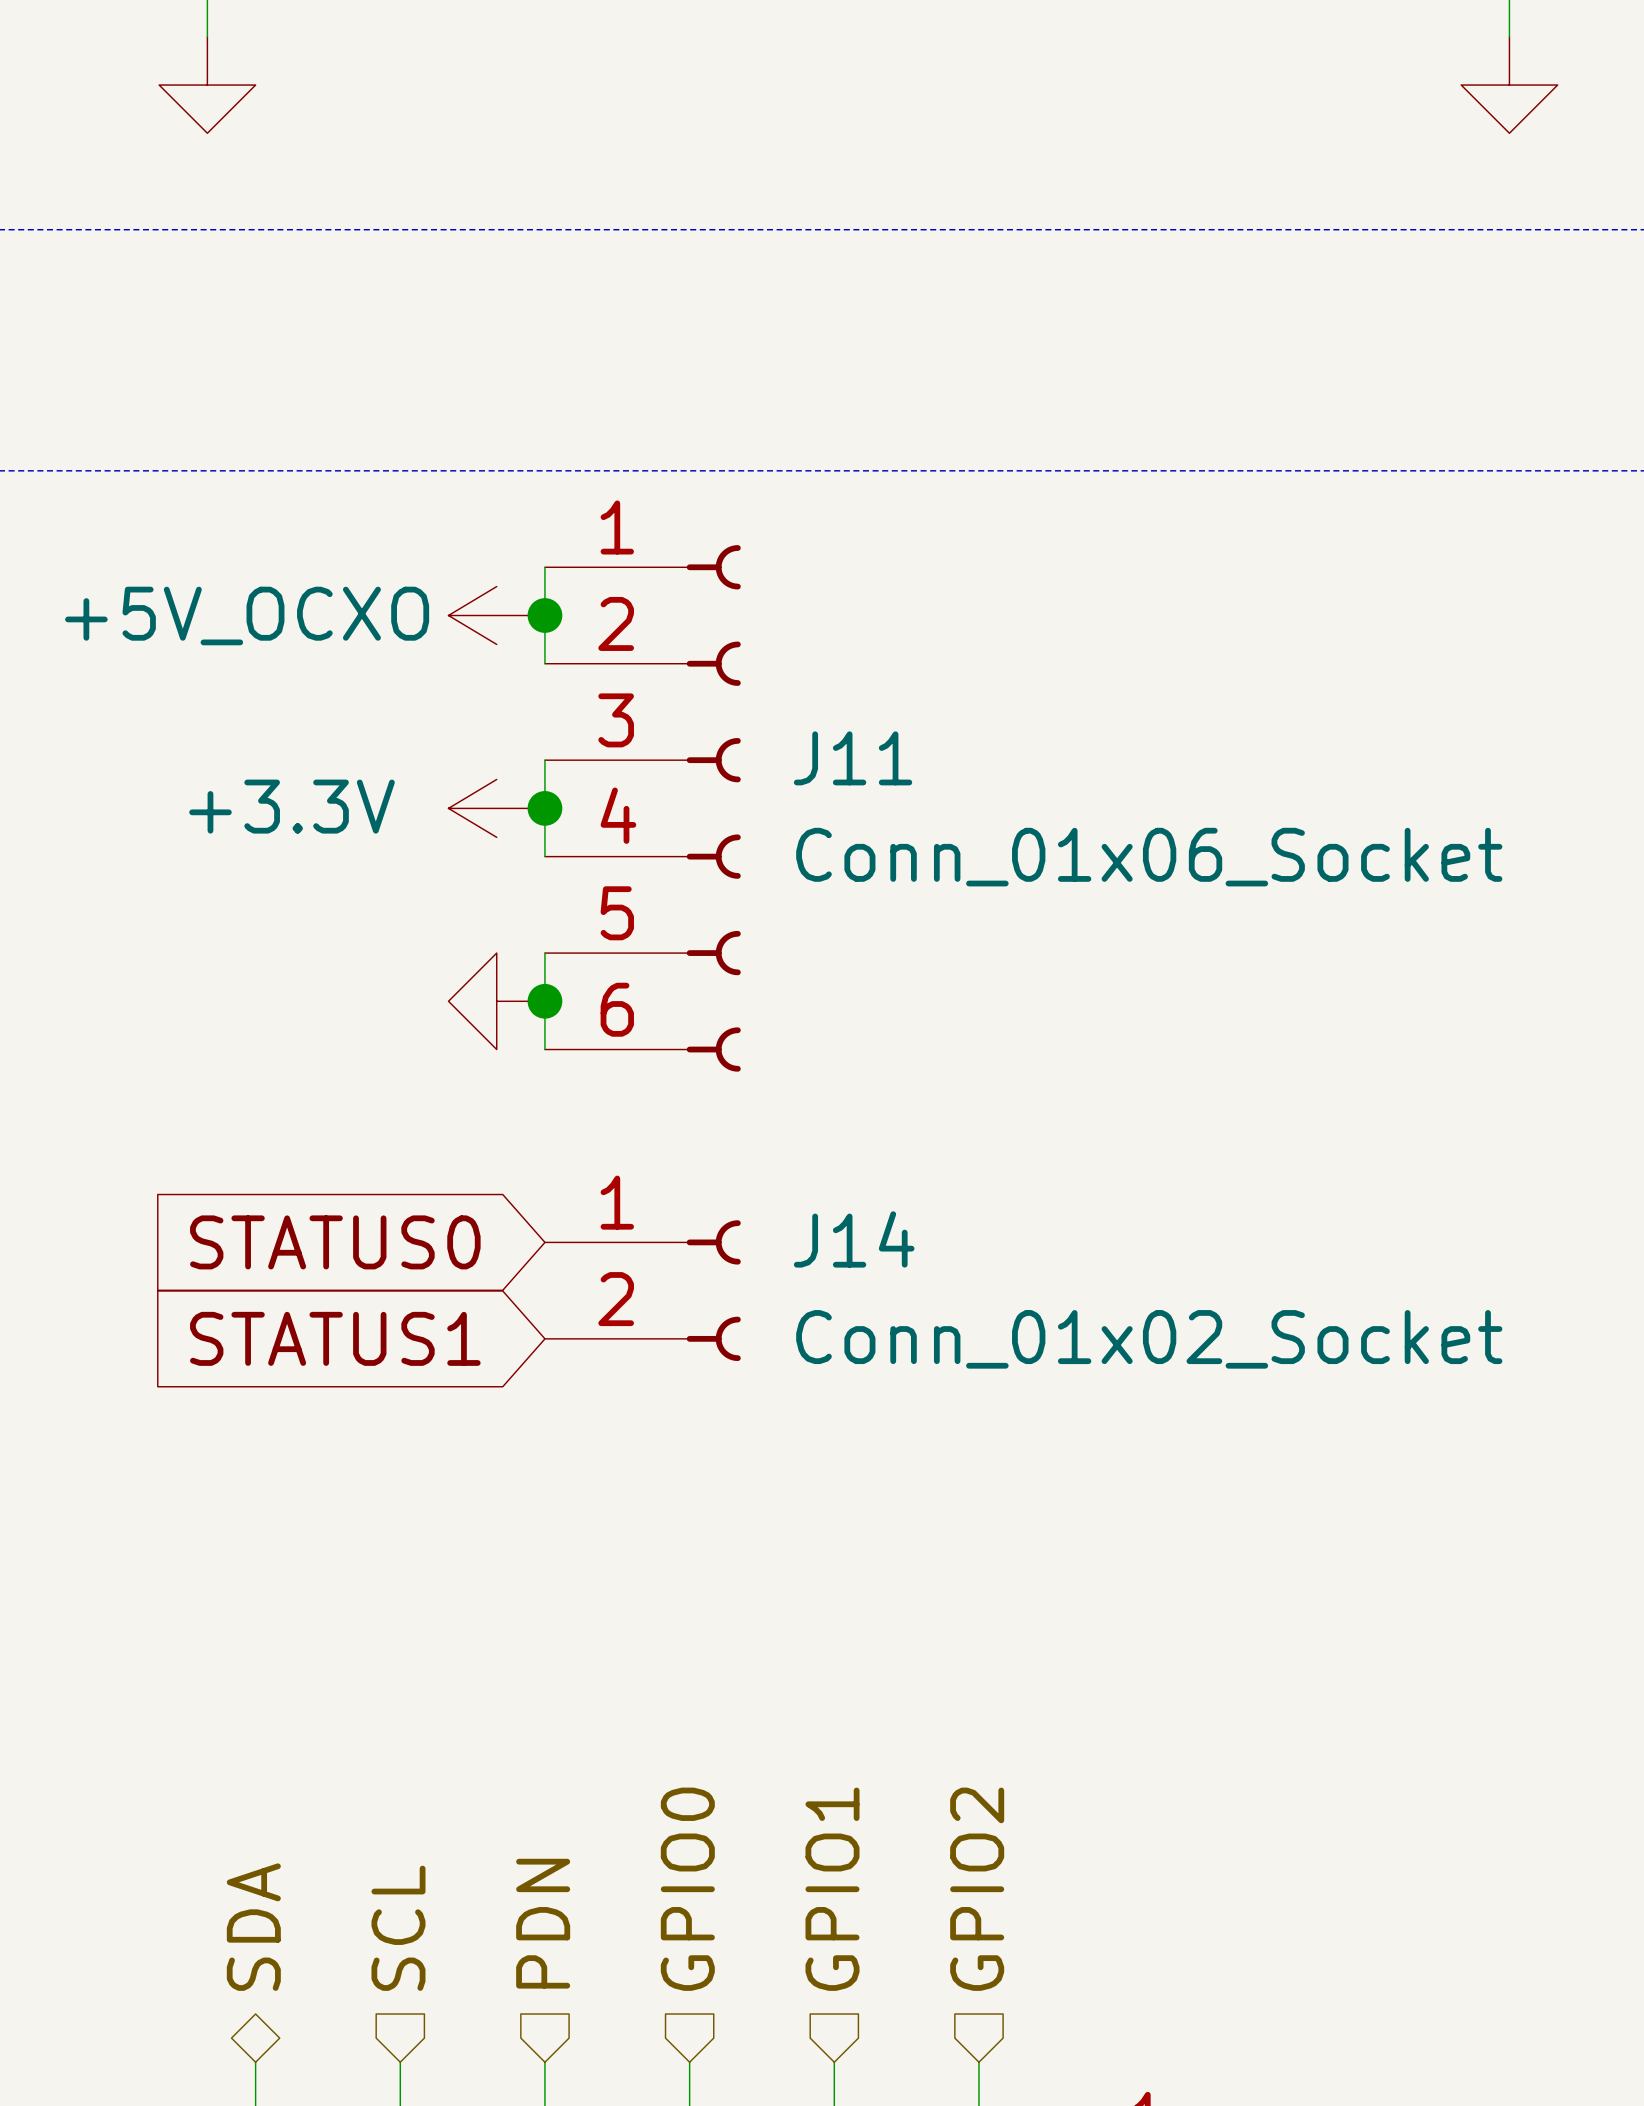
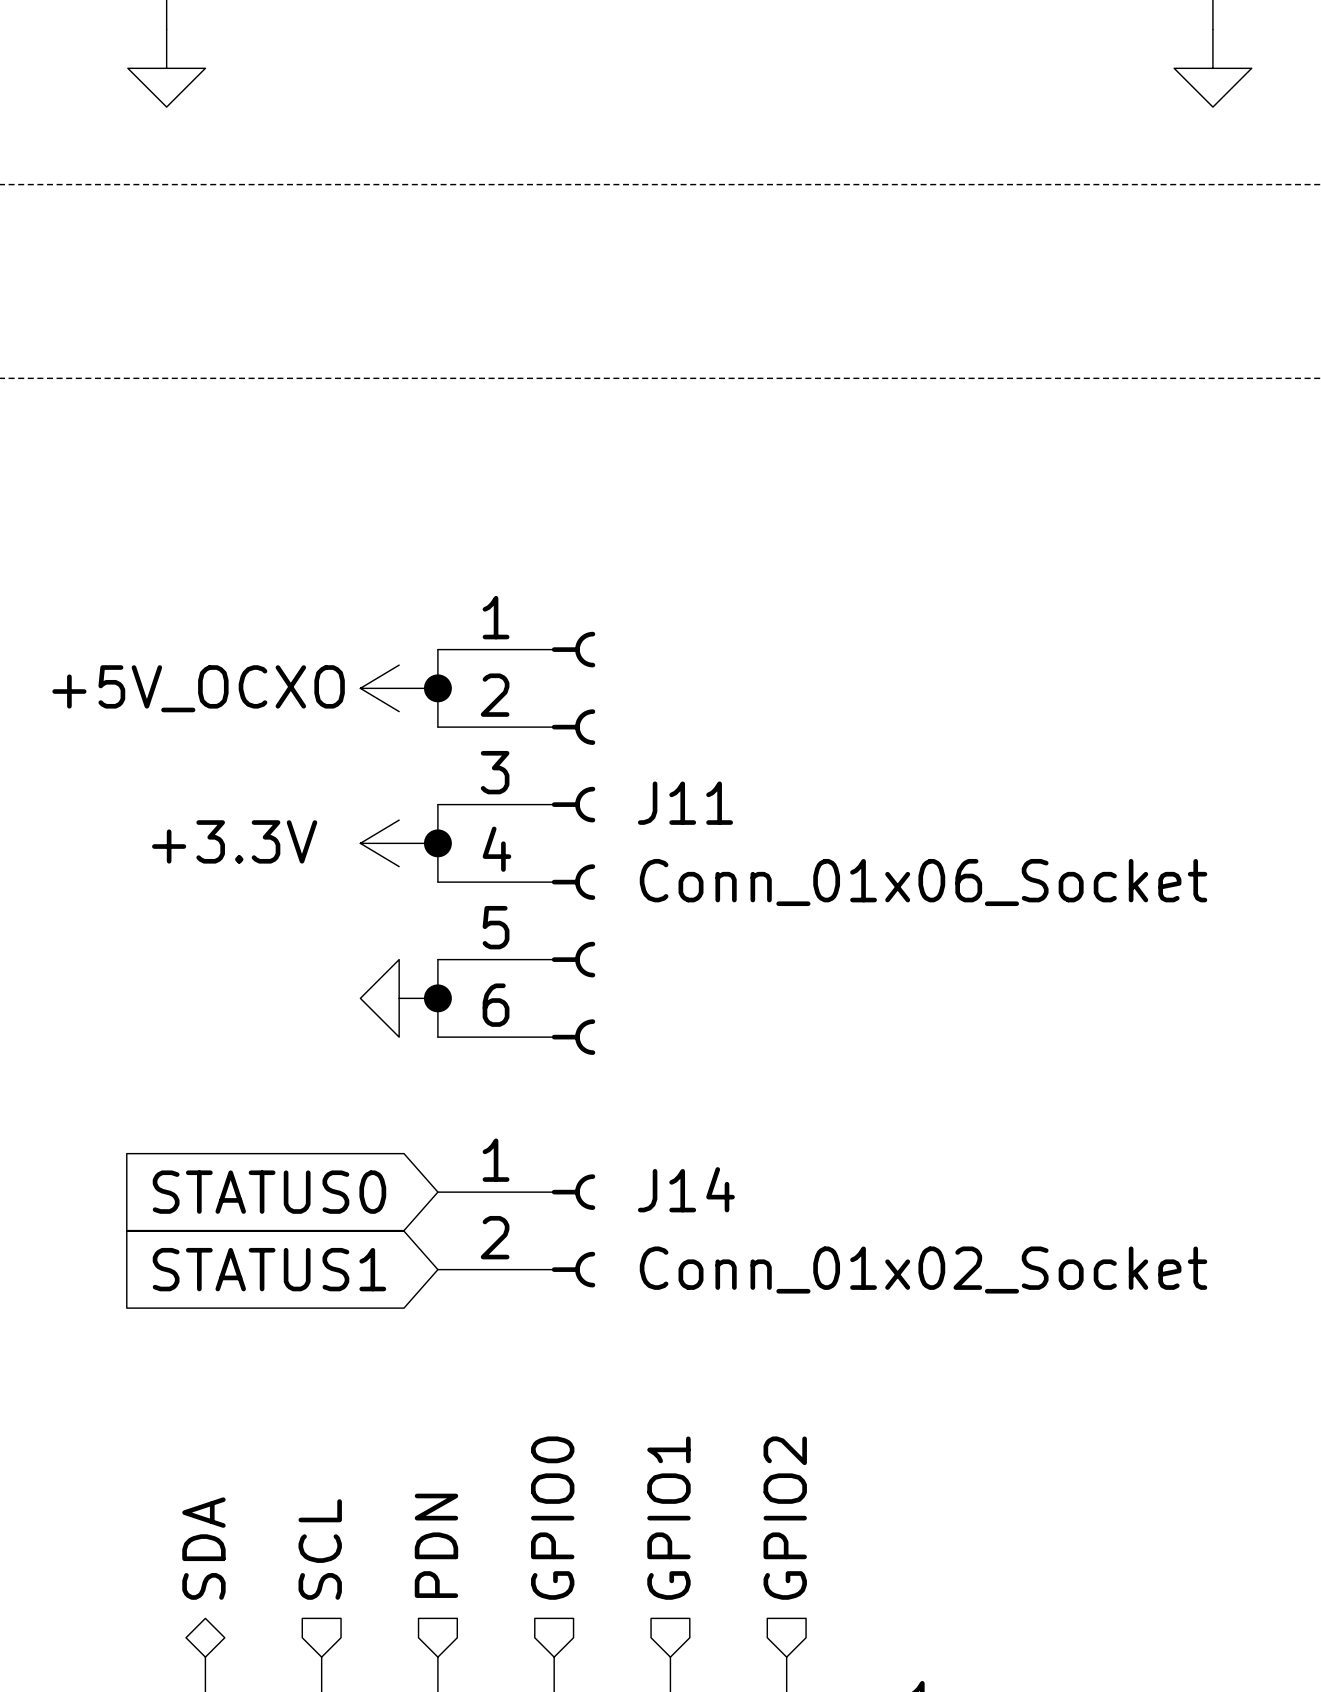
wire: (544, 567) (544, 663) -> (437, 959) (437, 1037)
power symbol position: +5V_OCXO (496, 615) -> +5V_OCXO (399, 688)
junction: (544, 615) -> none
wire: (544, 760) (544, 808) -> (437, 688) (437, 727)
power symbol position: +3.3V (496, 808) -> +3.3V (399, 843)
junction position: (544, 808) -> (437, 688)
J11 position: (642, 808) -> (516, 843)
wire: (544, 953) (544, 1001) -> (437, 843) (437, 882)
power symbol position: (496, 1001) -> (399, 998)
junction position: (544, 1001) -> (437, 843)
global label position: STATUS0 (335, 1242) -> STATUS0 (269, 1192)
junction: none -> (437, 998)
J14 position: (642, 1290) -> (516, 1230)
global label position: STATUS1 (335, 1338) -> STATUS1 (269, 1269)

